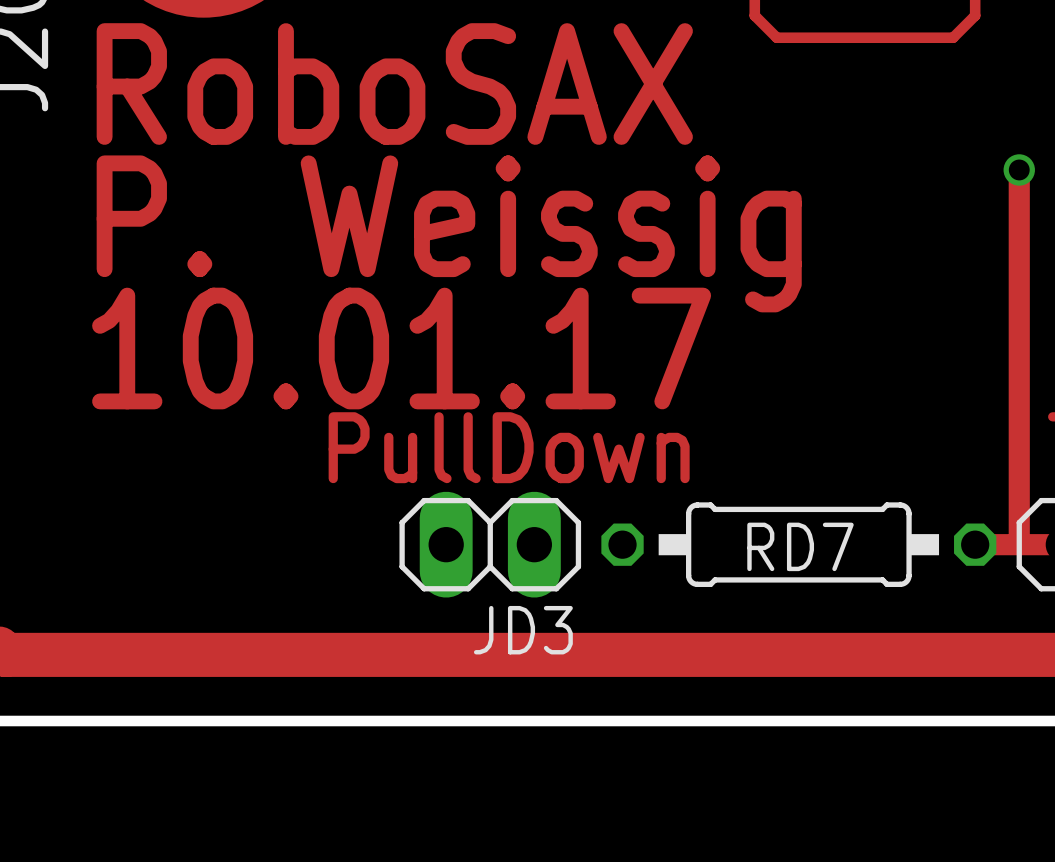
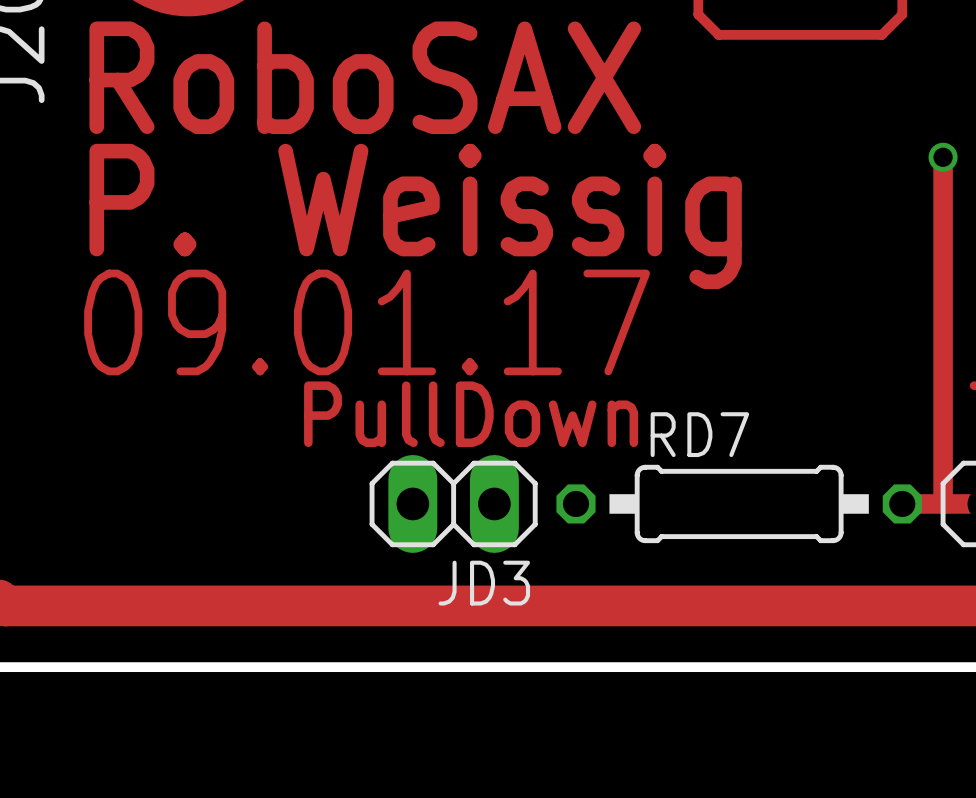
text: 10.01.17 (401, 348) -> 09.01.17 (367, 322)
RD7 name position: RD7 (800, 546) -> RD7 (699, 434)

